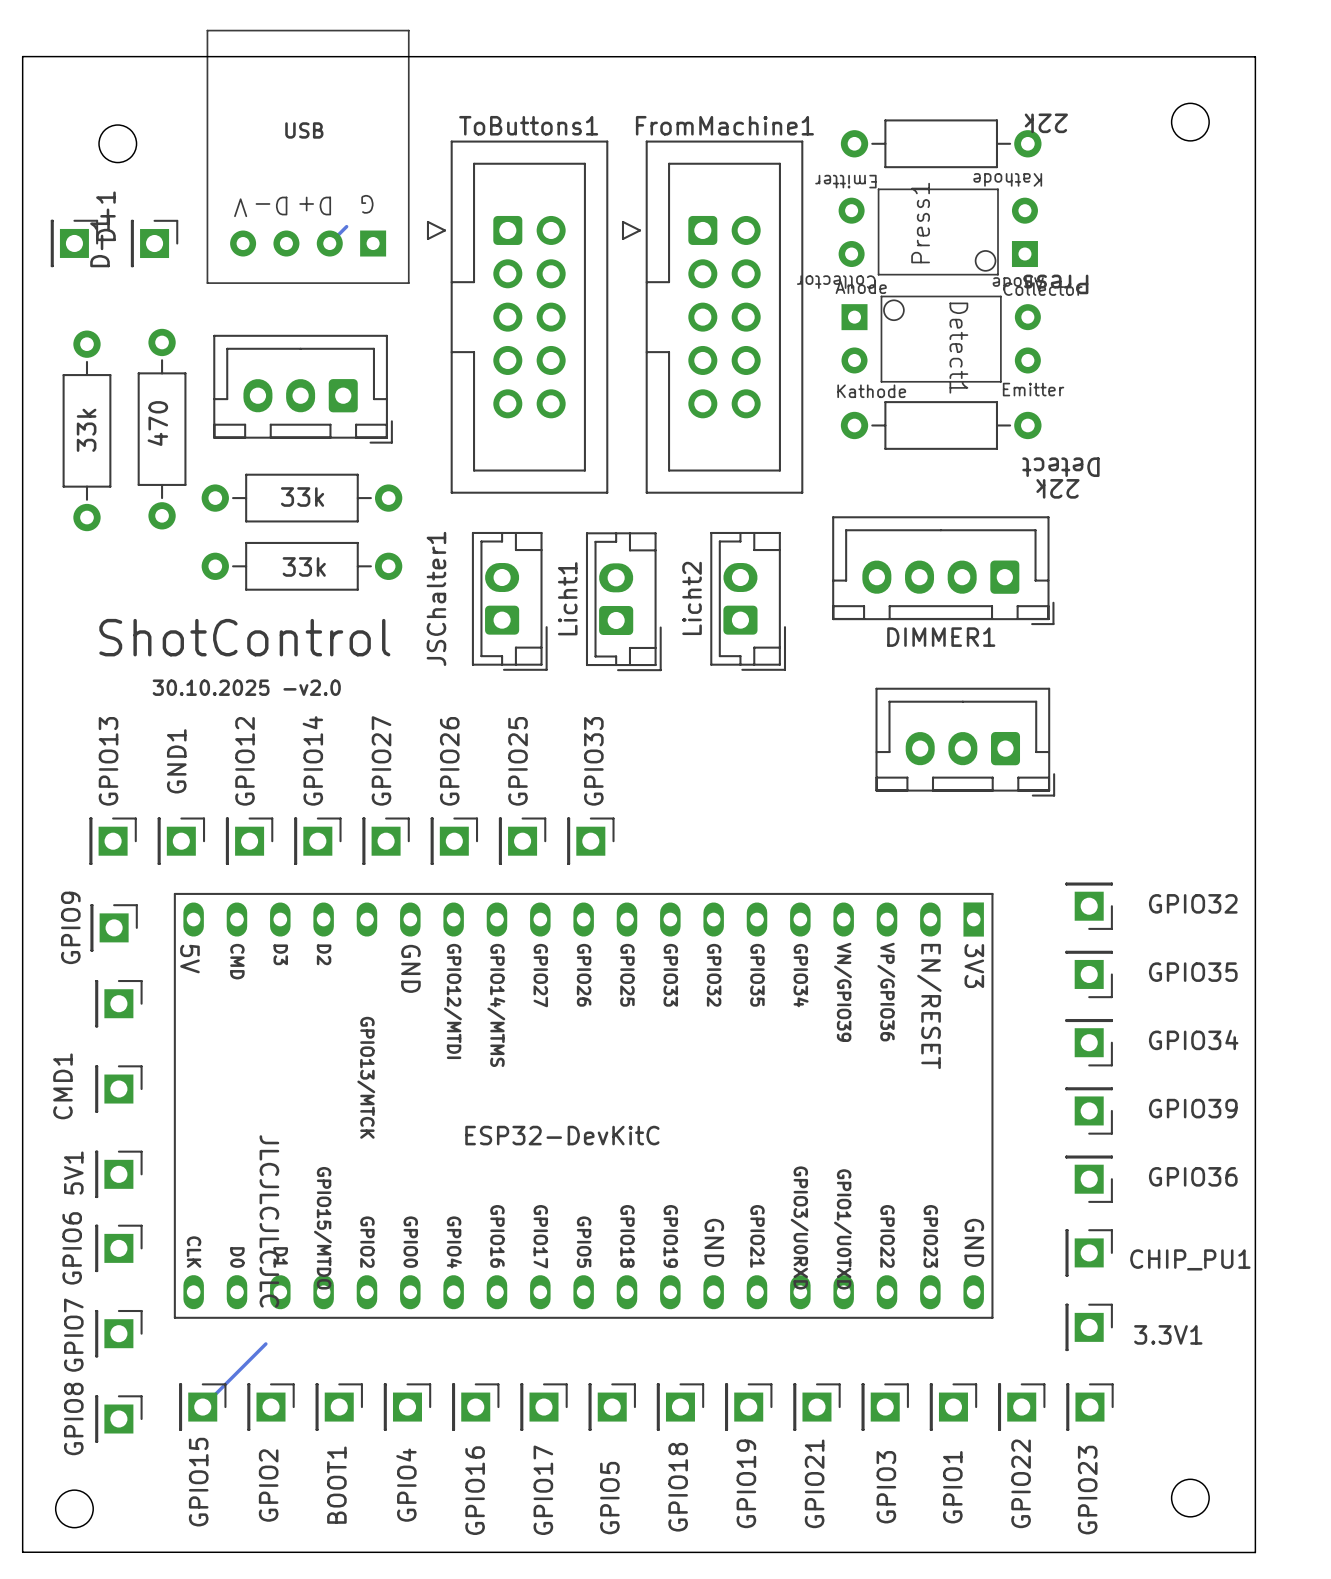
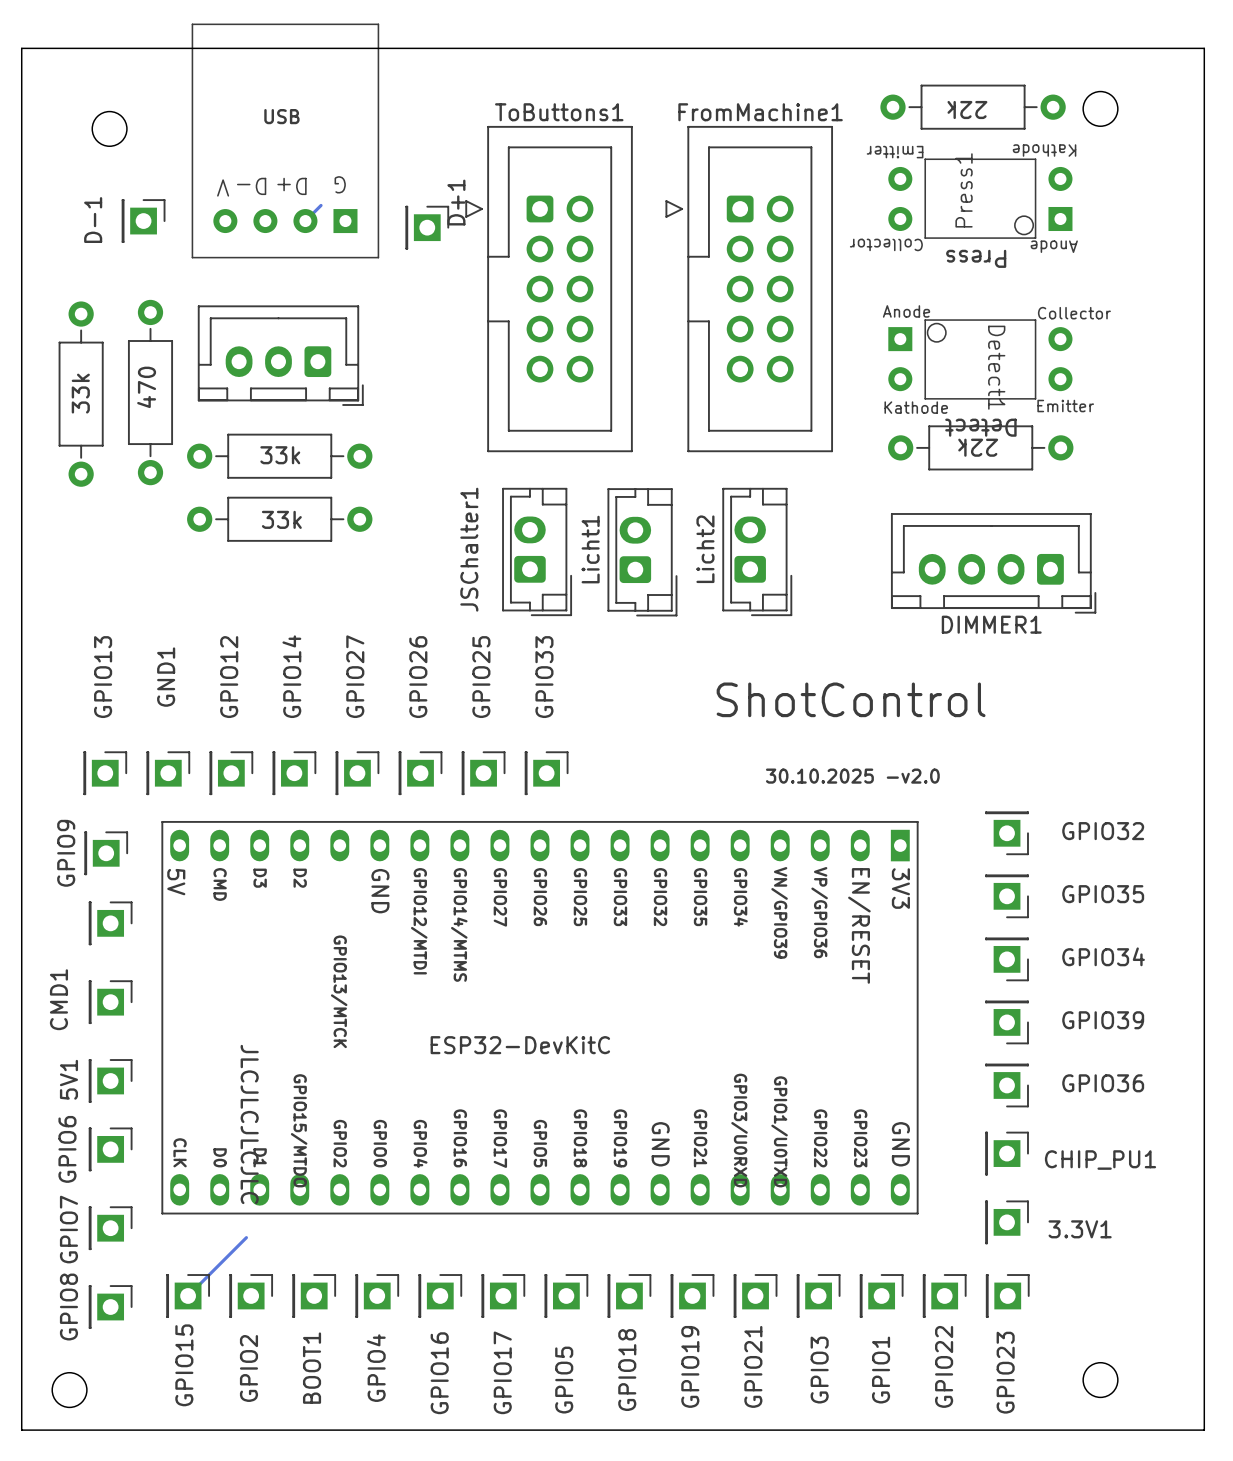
board edge: (22, 56) (1255, 56) (1255, 1552) (22, 1552) -> (21, 48) (1204, 48) (1204, 1430) (21, 1430)
part position: (941, 143) -> (973, 107)
Press1 position: (938, 232) -> (980, 198)
D+1 position: (74, 243) -> (427, 227)
ToButtons1 position: (517, 317) -> (549, 289)
FromMachine1 position: (712, 317) -> (749, 289)
Detect1 position: (941, 339) -> (980, 359)
part position: (941, 425) -> (980, 447)
DIMMER1 position: (943, 570) -> (993, 563)
JSChalter1 position: (509, 601) -> (537, 551)
Licht1 position: (623, 601) -> (642, 552)
Licht2 position: (748, 601) -> (757, 551)
text: ShotControl (244, 637) -> none
text: 30.10.2025 -v2.0 (246, 687) -> none
part: (965, 742) -> none
GPIO14 name position: GPIO14 (312, 760) -> GPIO14 (291, 676)
GPIO27 name position: GPIO27 (381, 760) -> GPIO27 (355, 676)
GPIO13 name position: GPIO13 (108, 761) -> GPIO13 (103, 677)
GND1 name position: GND1 (176, 761) -> GND1 (166, 677)
GPIO12 name position: GPIO12 (245, 761) -> GPIO12 (229, 677)
GPIO26 name position: GPIO26 (449, 761) -> GPIO26 (418, 677)
GPIO25 name position: GPIO25 (518, 761) -> GPIO25 (481, 677)
GPIO33 name position: GPIO33 (593, 761) -> GPIO33 (544, 677)
text: none -> ShotControl (851, 699)
text: none -> 30.10.2025 -v2.0 (852, 776)

